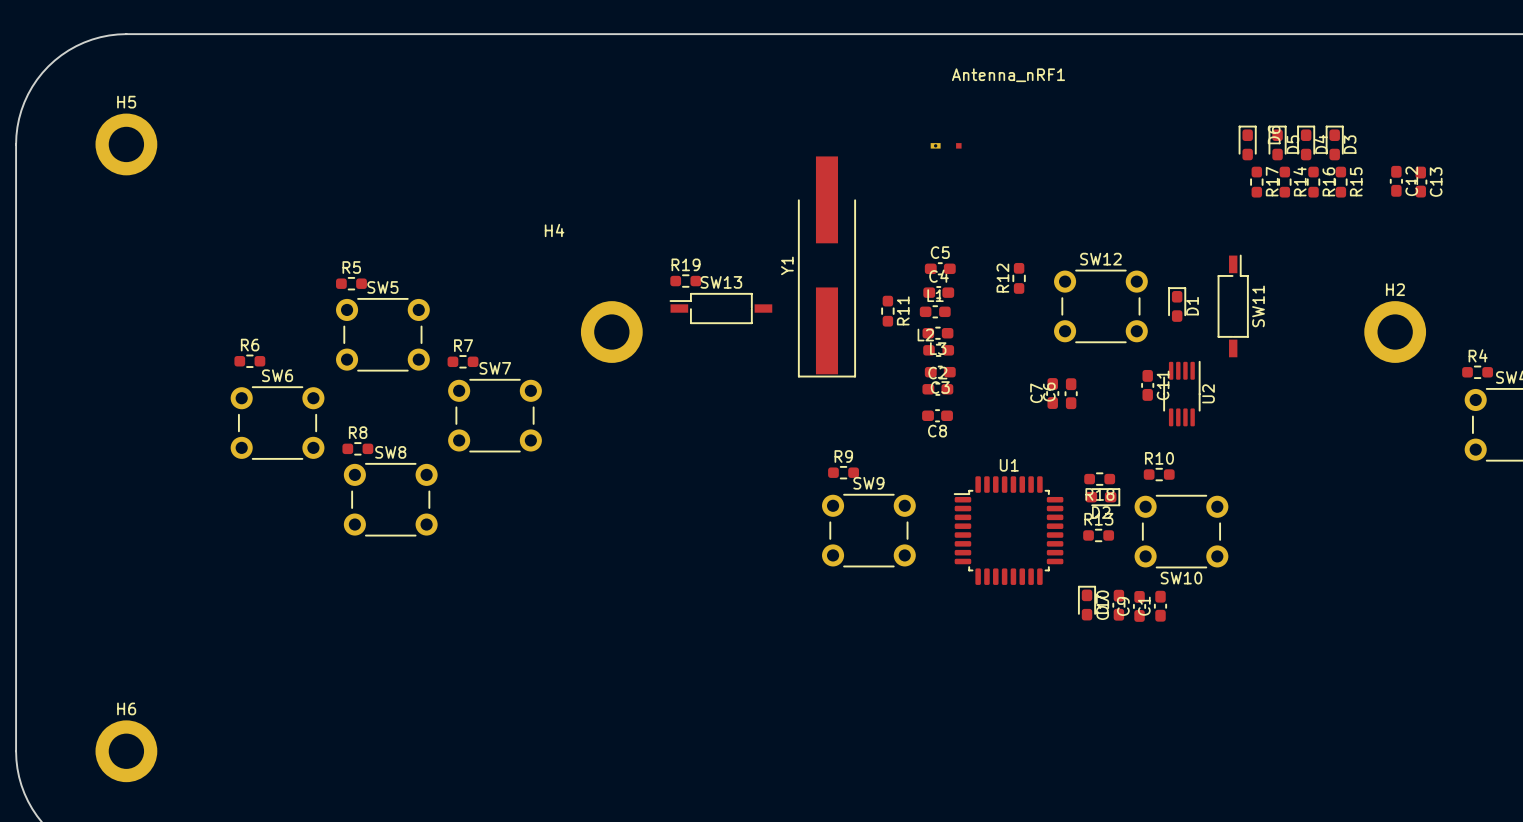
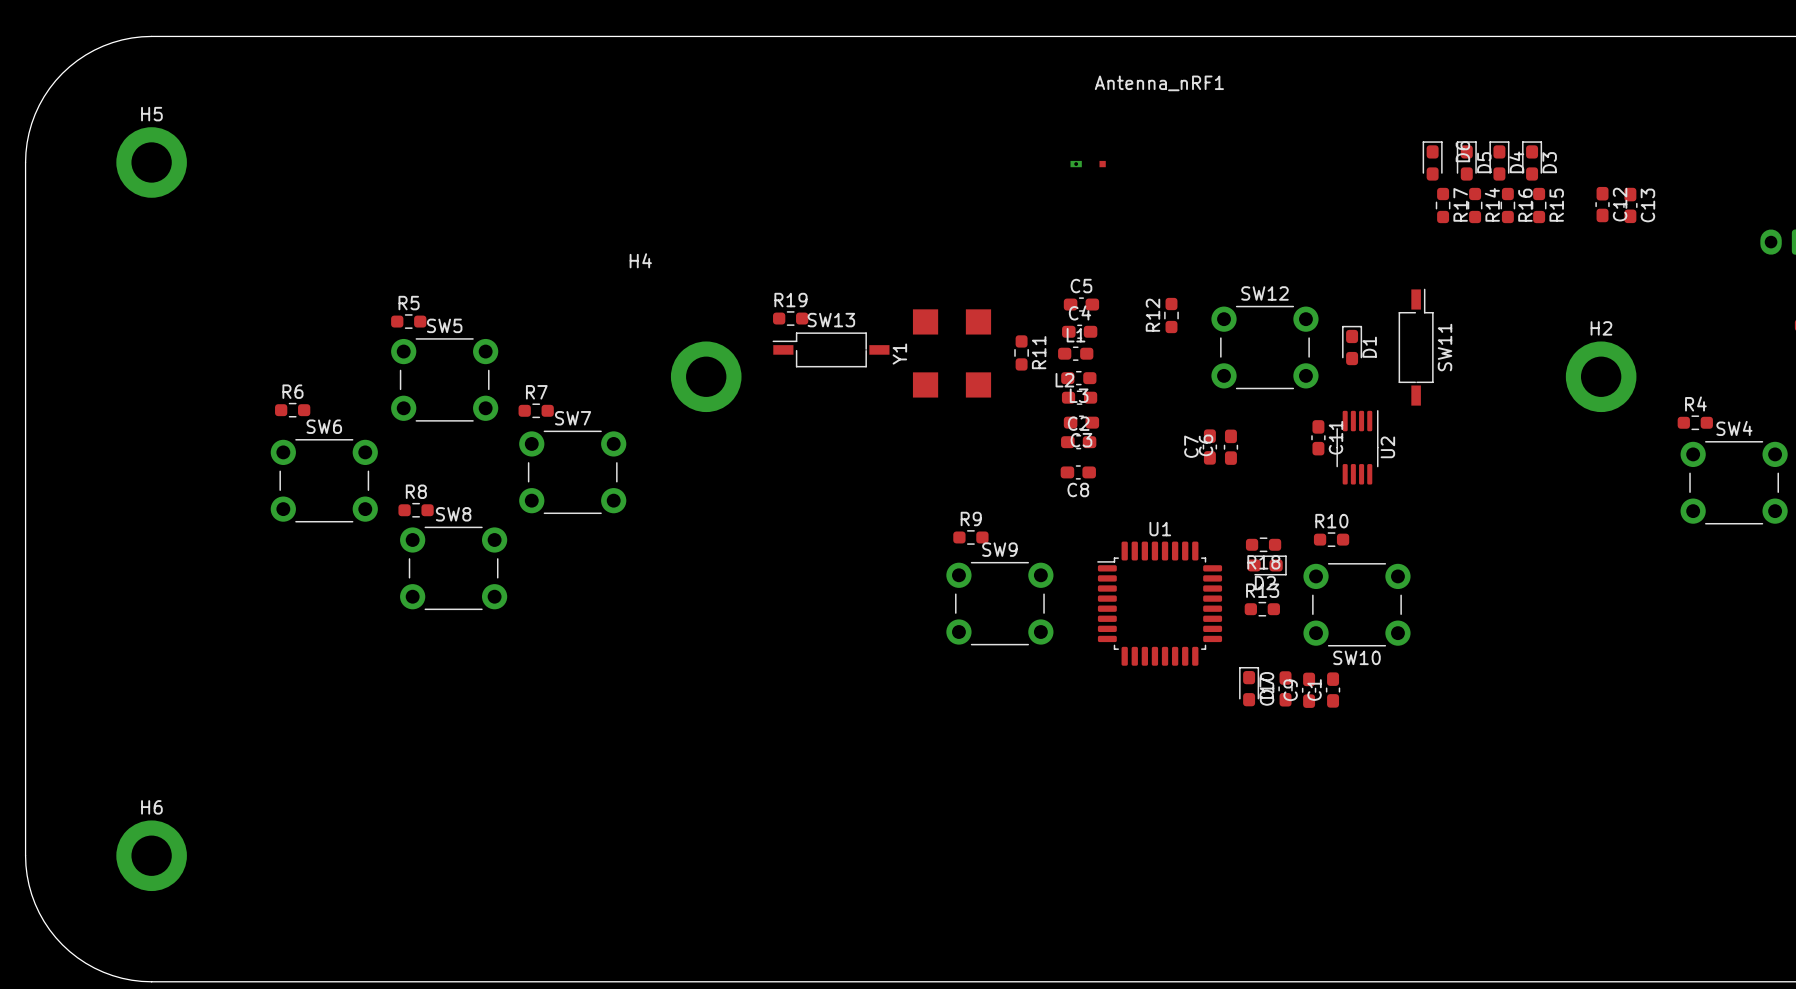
Y1 footprint: [798, 156, 856, 378] -> [912, 309, 992, 398]

